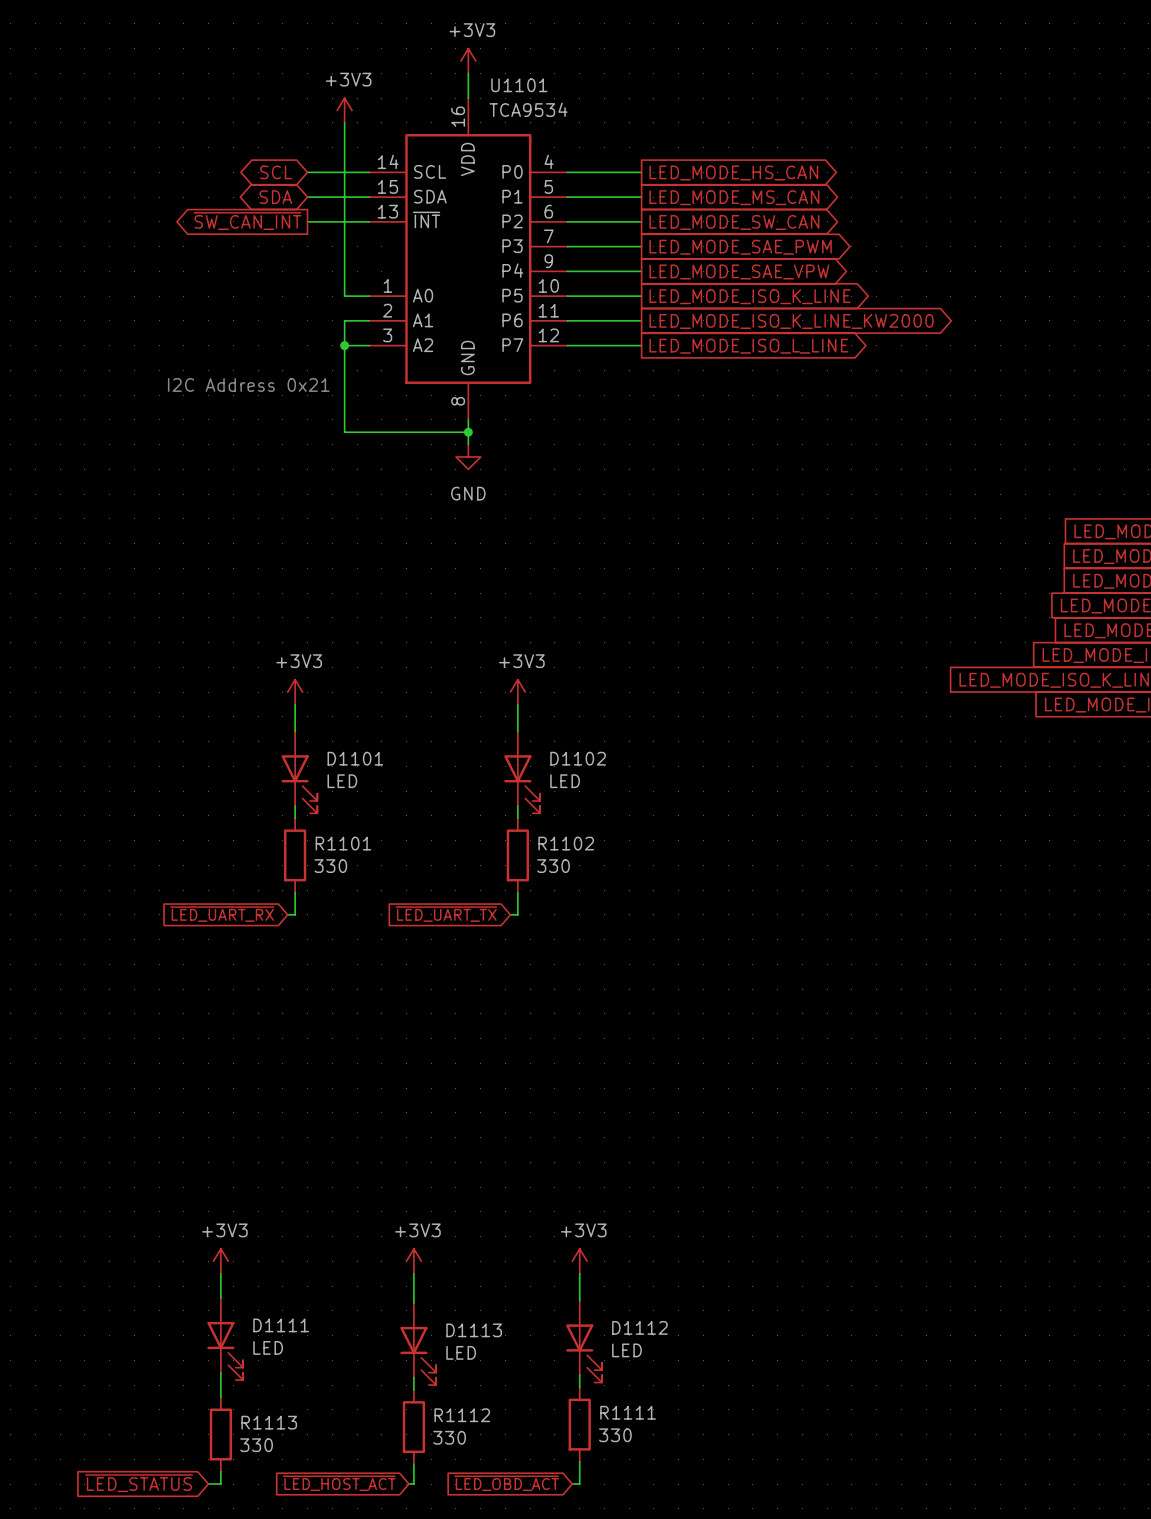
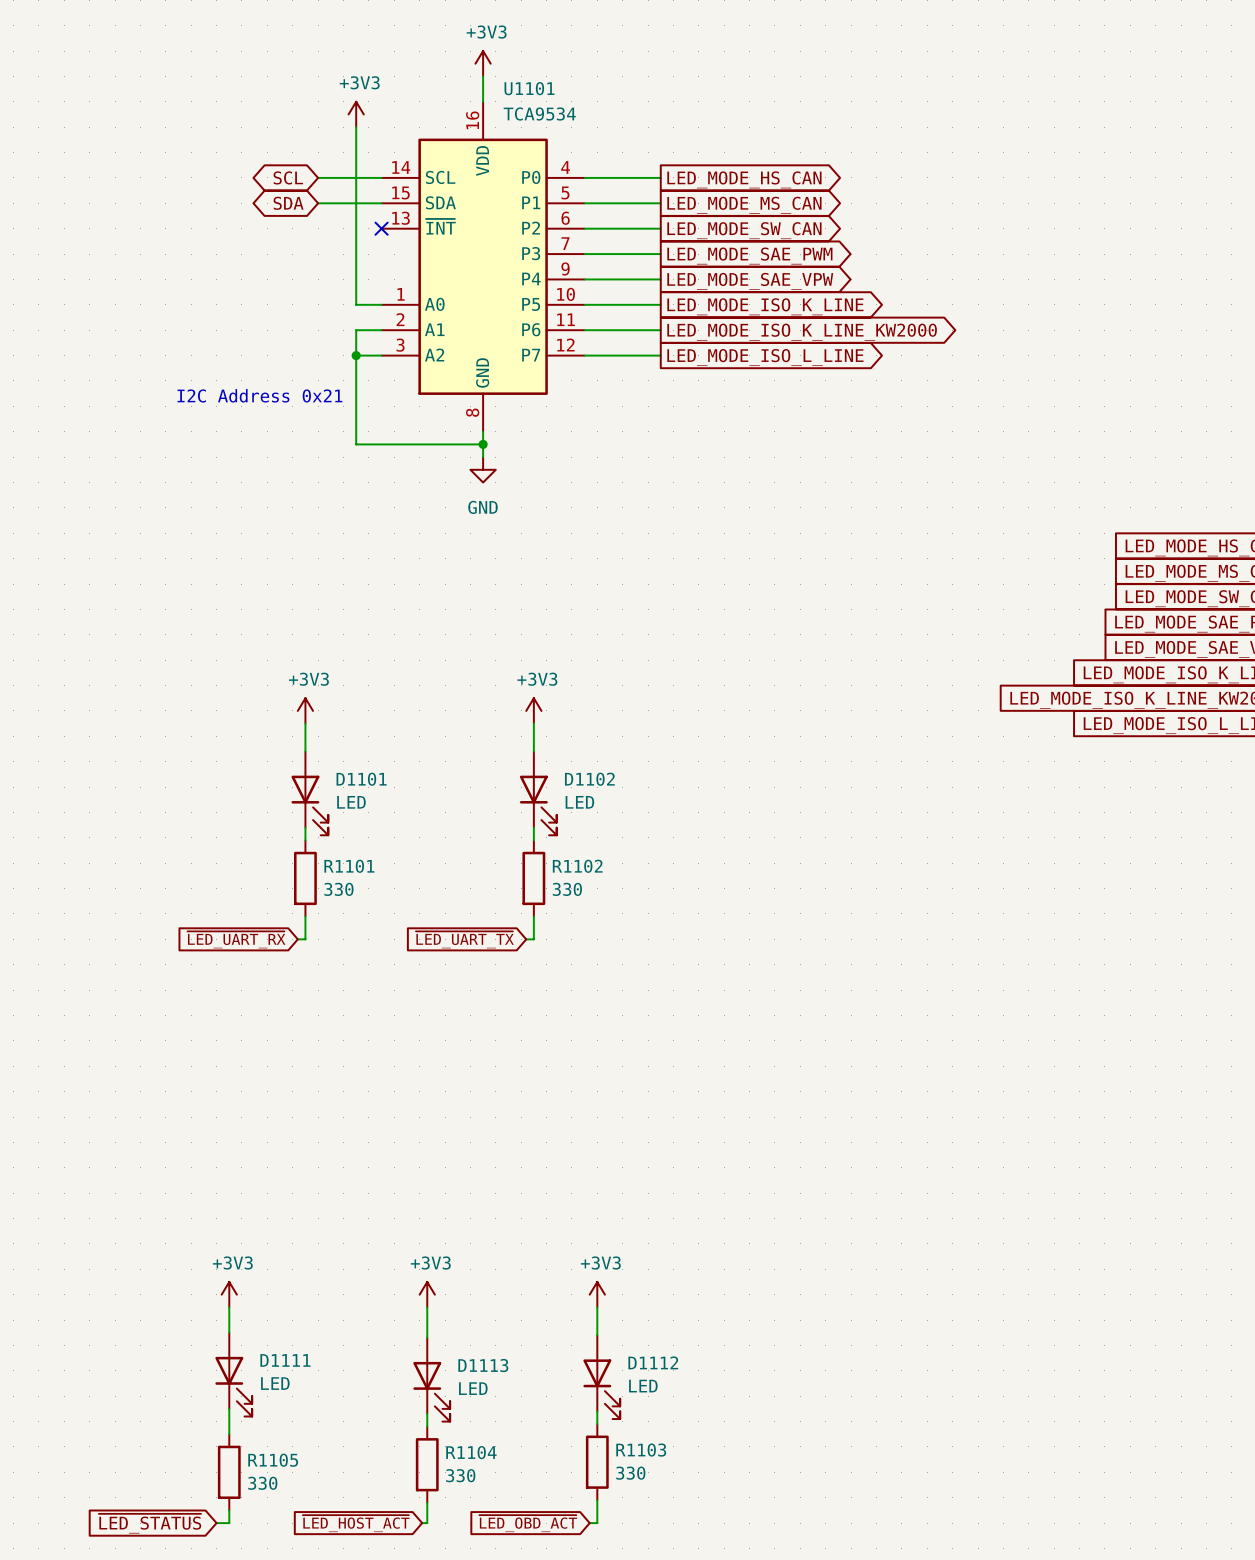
global label: ~{SW_CAN_INT} (247, 221) -> none
wire: (307, 221) (369, 221) -> none
no-connect mark: none -> (381, 228)
R1111 name: R1111 (628, 1412) -> R1103 (641, 1450)
R1112 name: R1112 (462, 1415) -> R1104 (471, 1452)
R1113 name: R1113 (269, 1422) -> R1105 (273, 1460)

